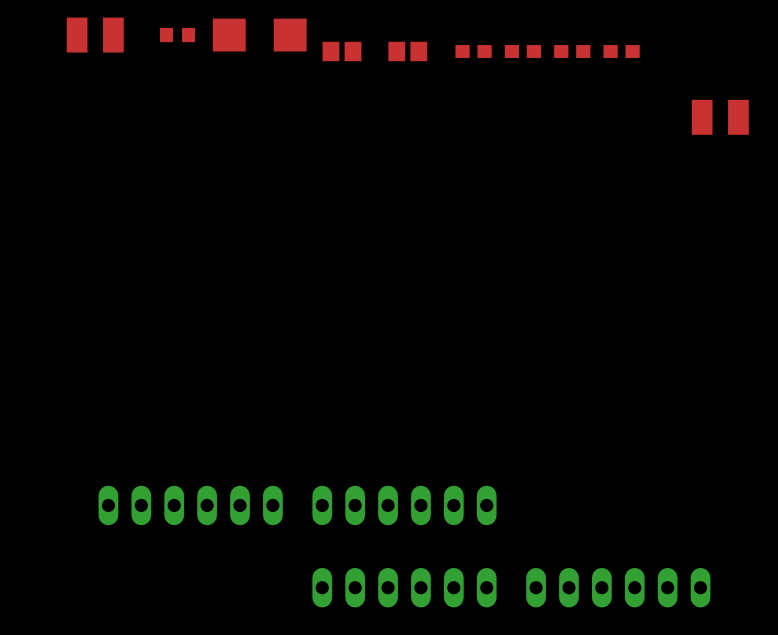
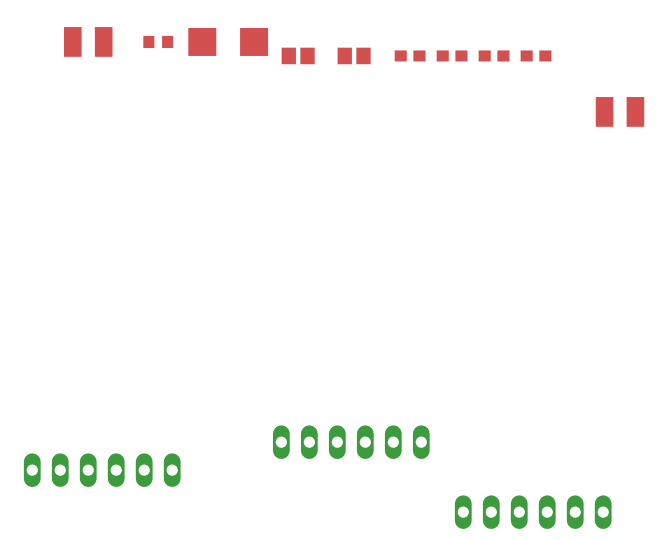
part position: (190, 505) -> (102, 470)
part: (404, 587) -> none

